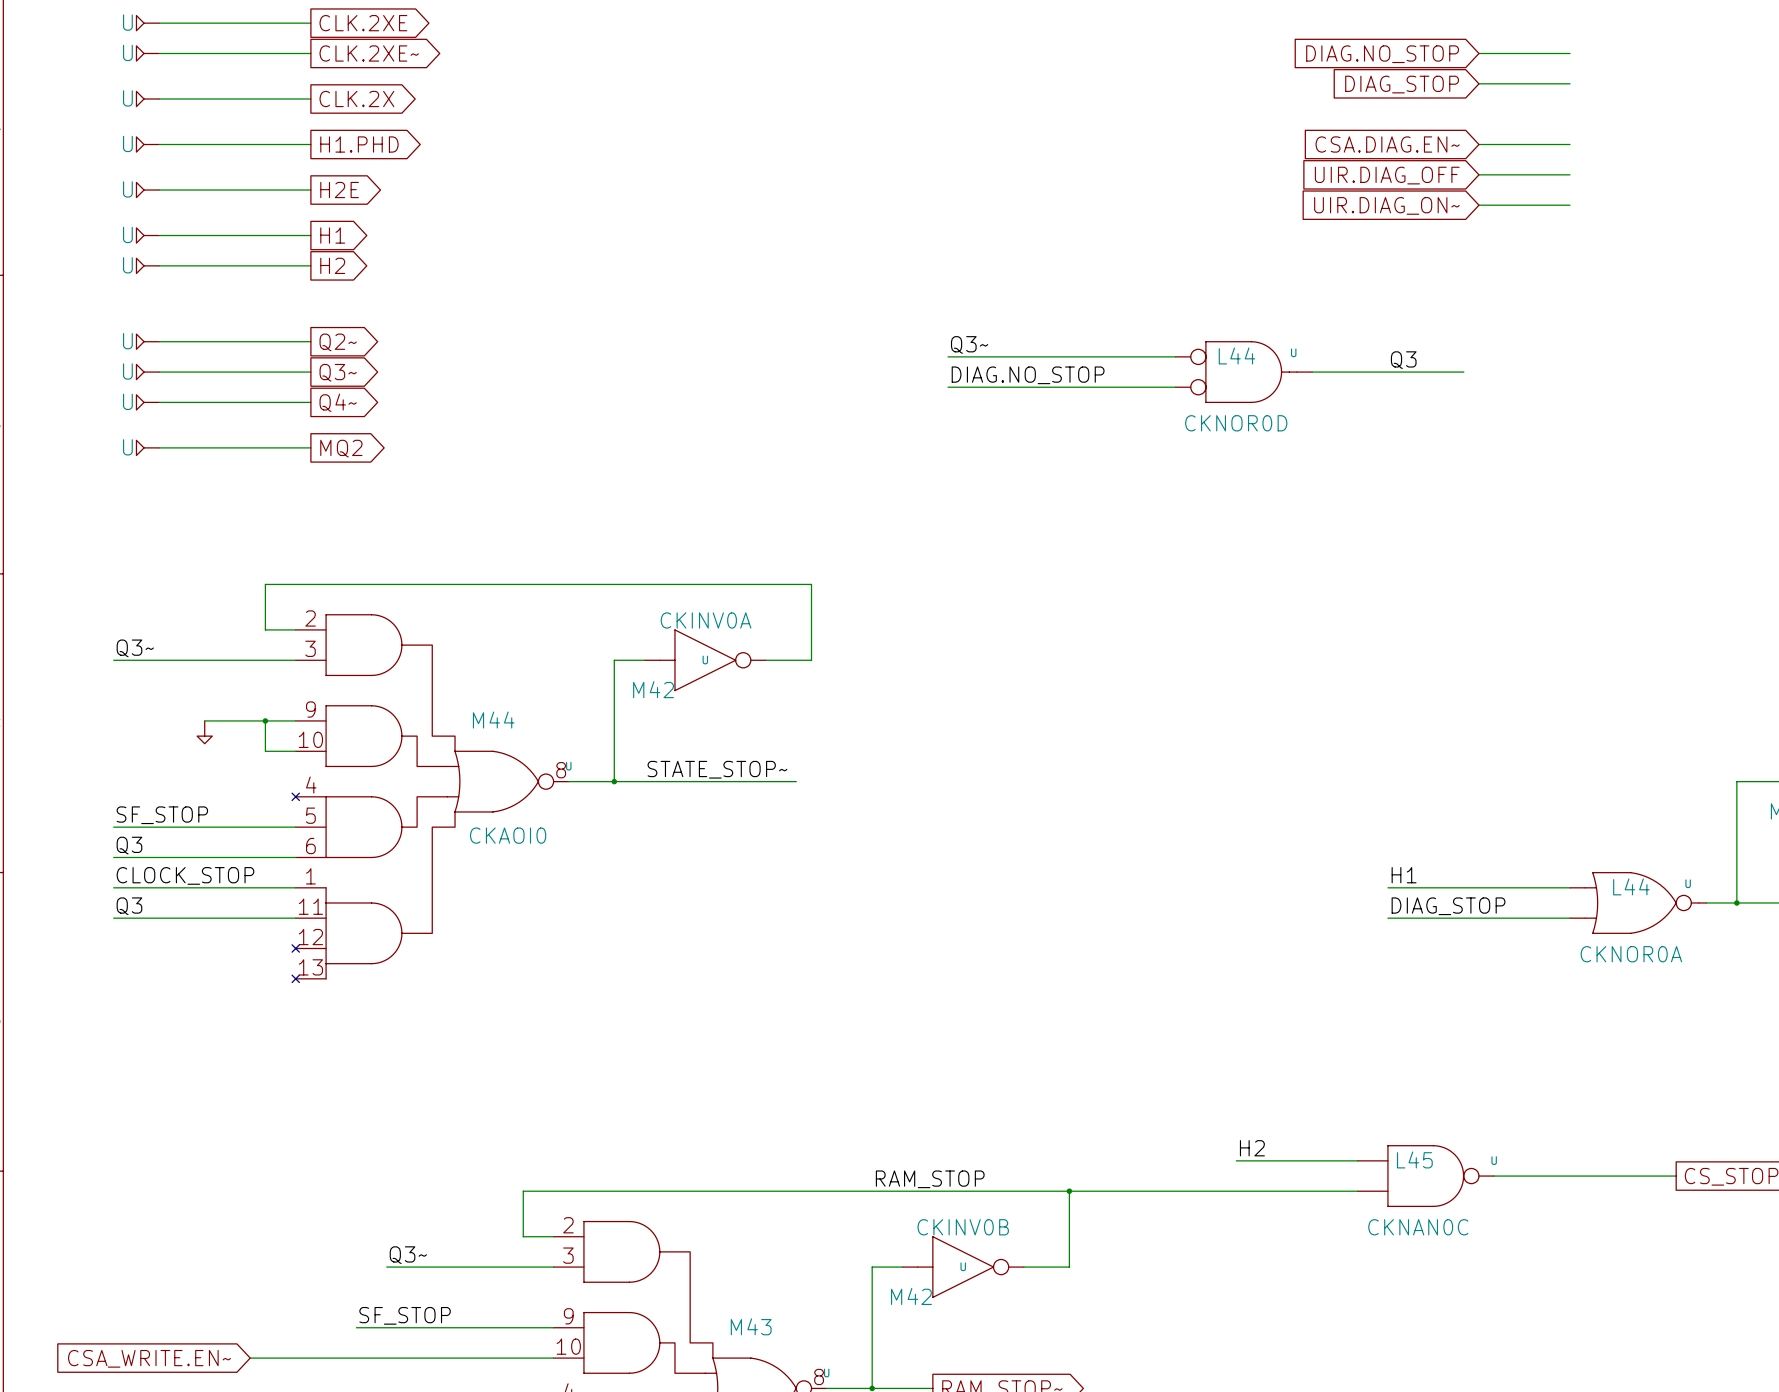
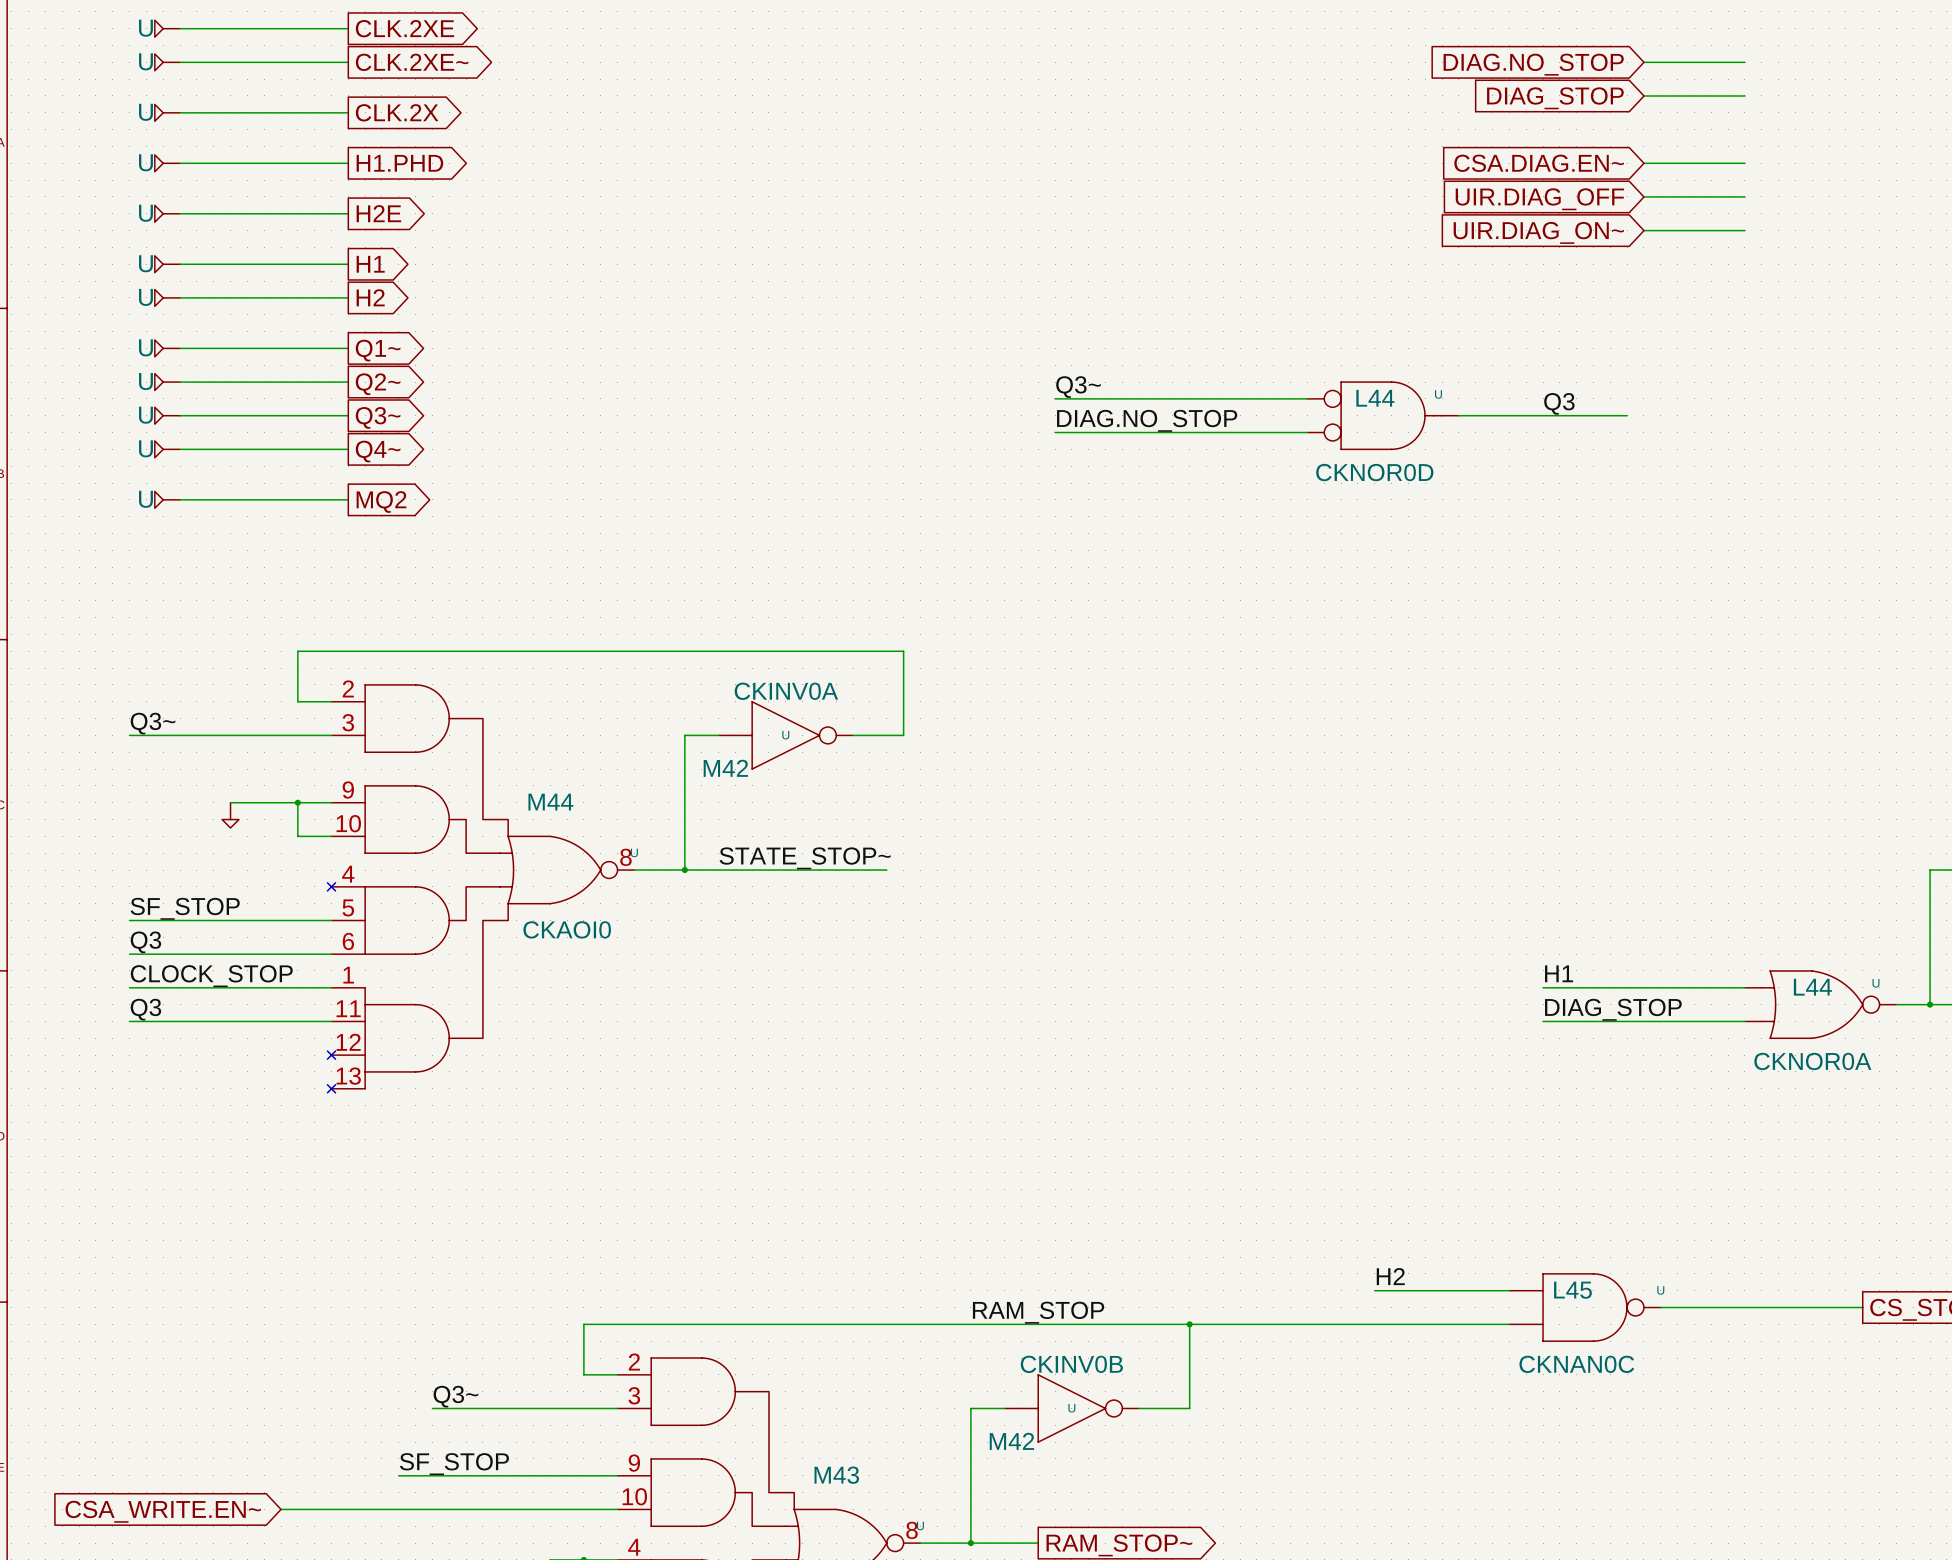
U: none -> (167, 348)
wire: none -> (180, 348) (348, 348)
global label: none -> Q1~ (378, 350)

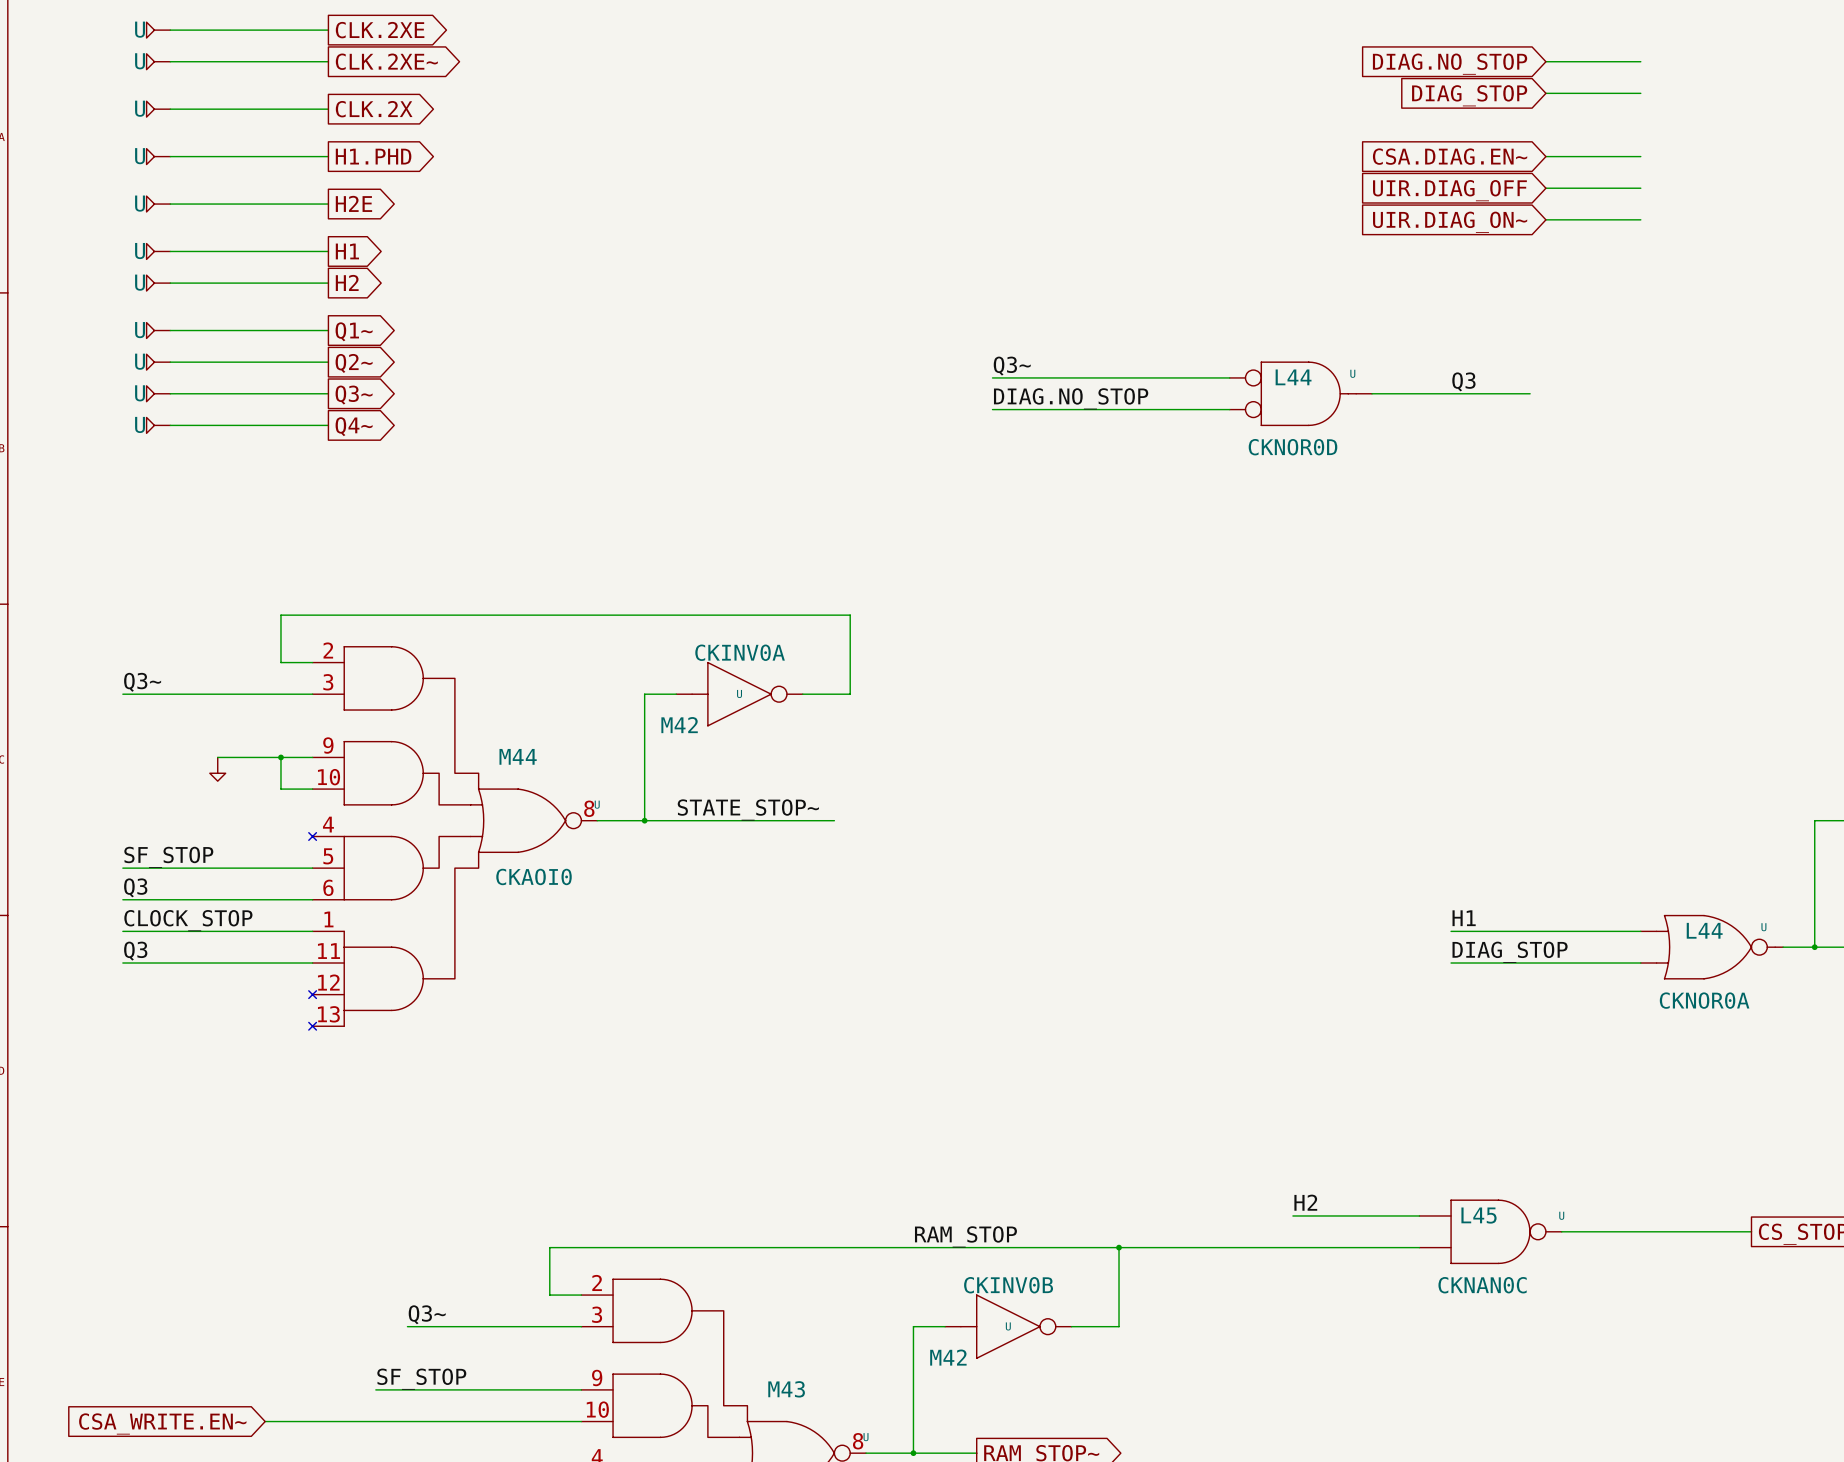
U: (167, 499) -> none
wire: (180, 499) (348, 499) -> none
global label: MQ2 (381, 502) -> none

